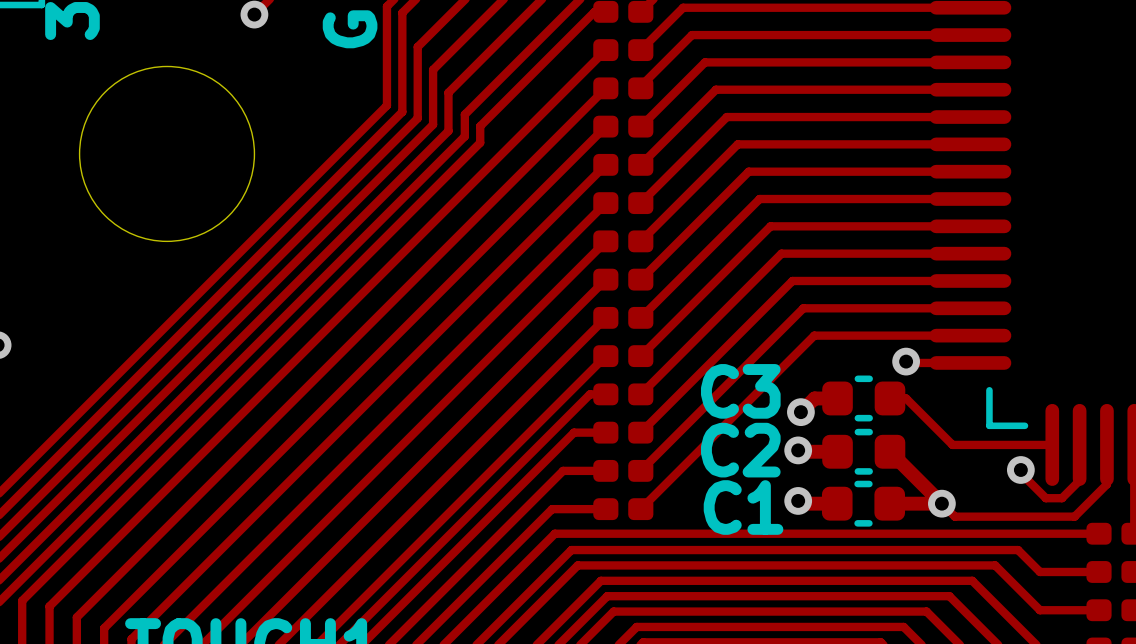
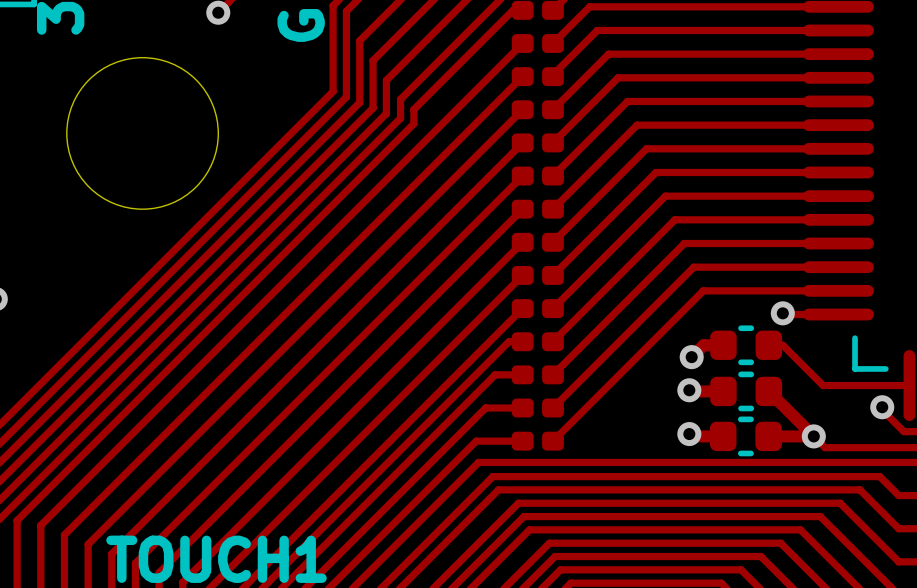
C3 name: C3 (740, 391) -> none
C2 name: C2 (740, 450) -> none
C1 name: C1 (743, 507) -> none

